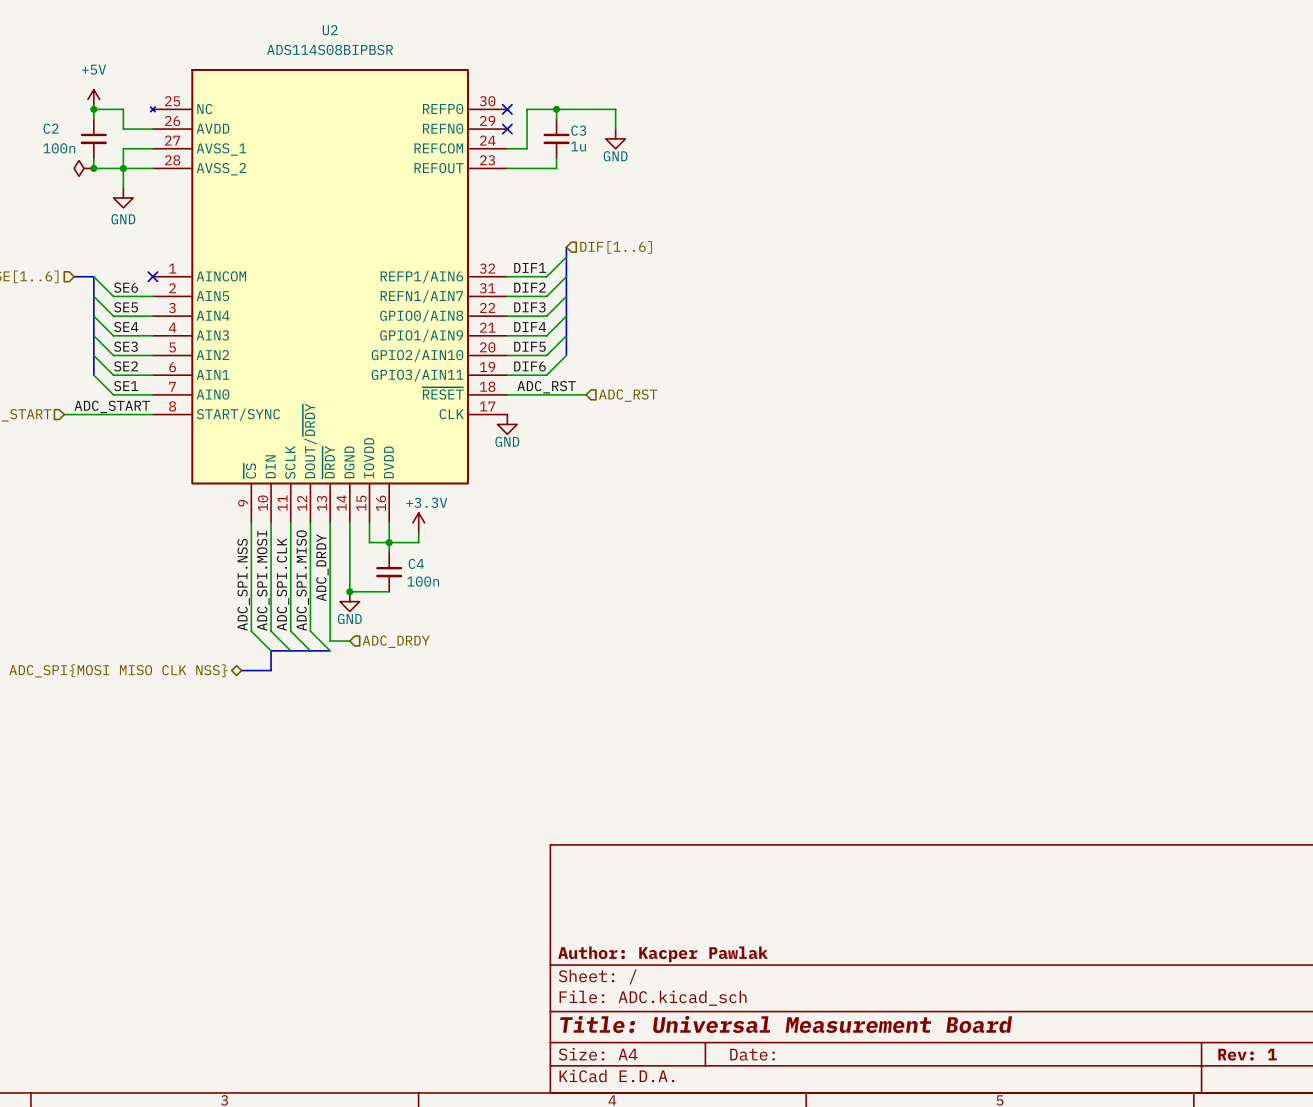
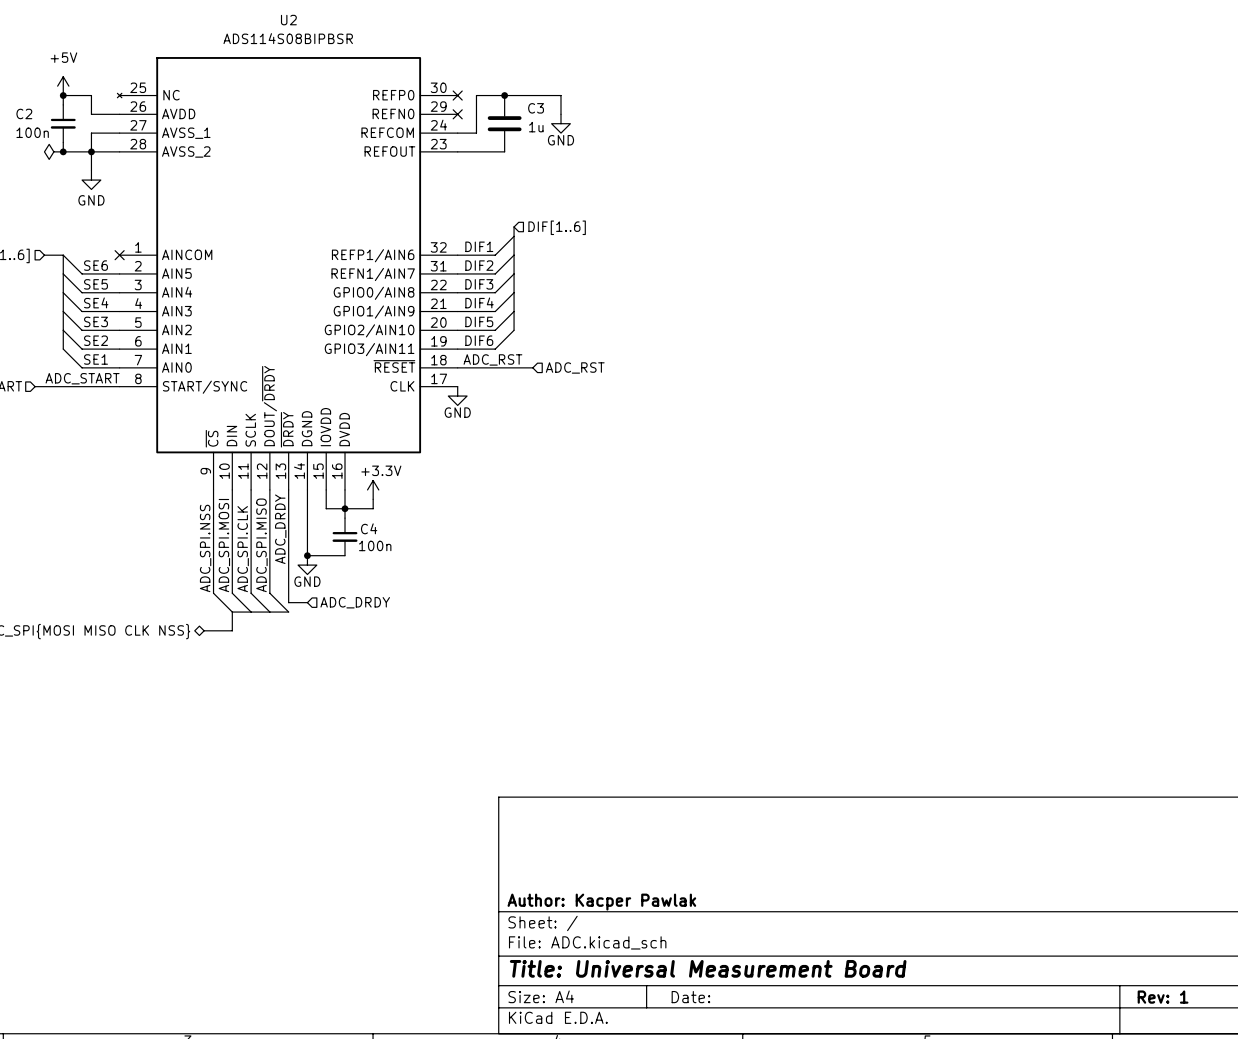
C3 symbol: [543, 119, 570, 159] -> [487, 95, 522, 152]

